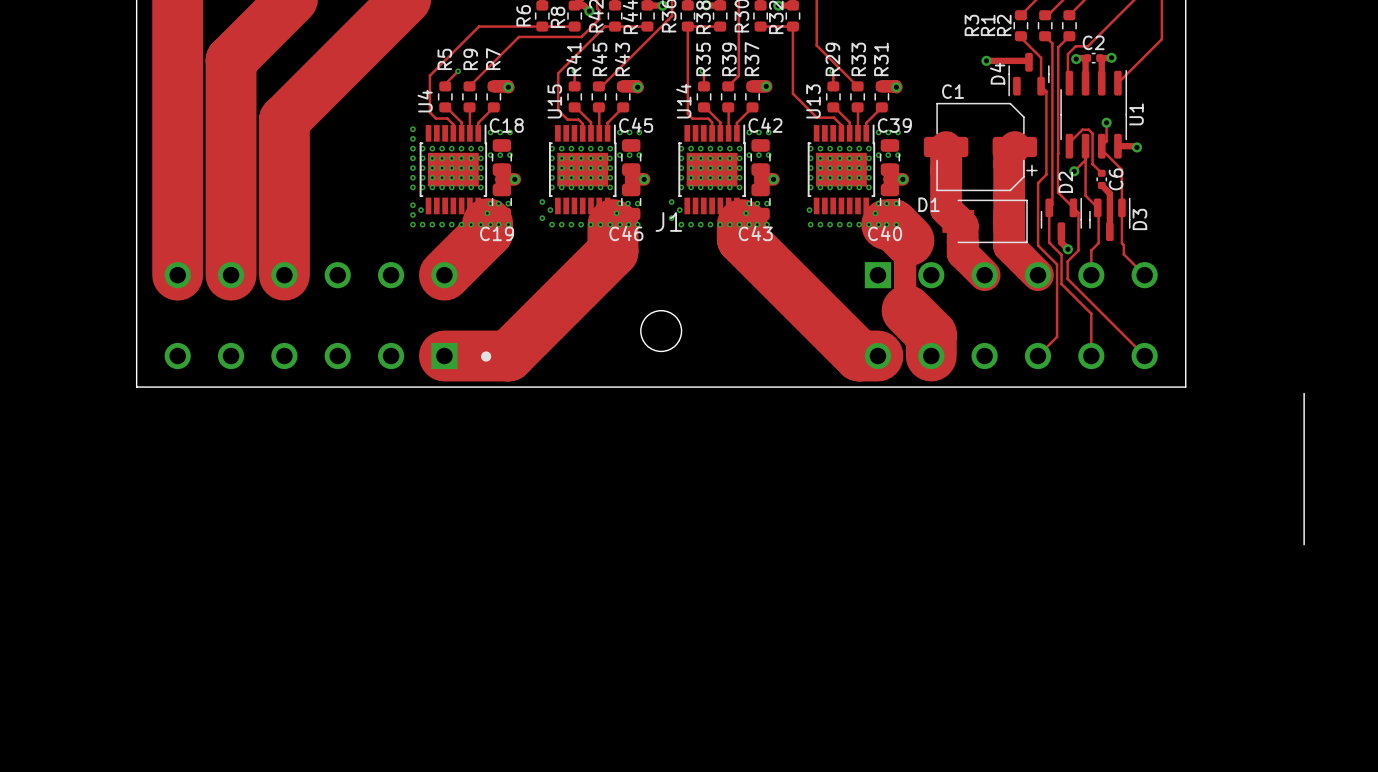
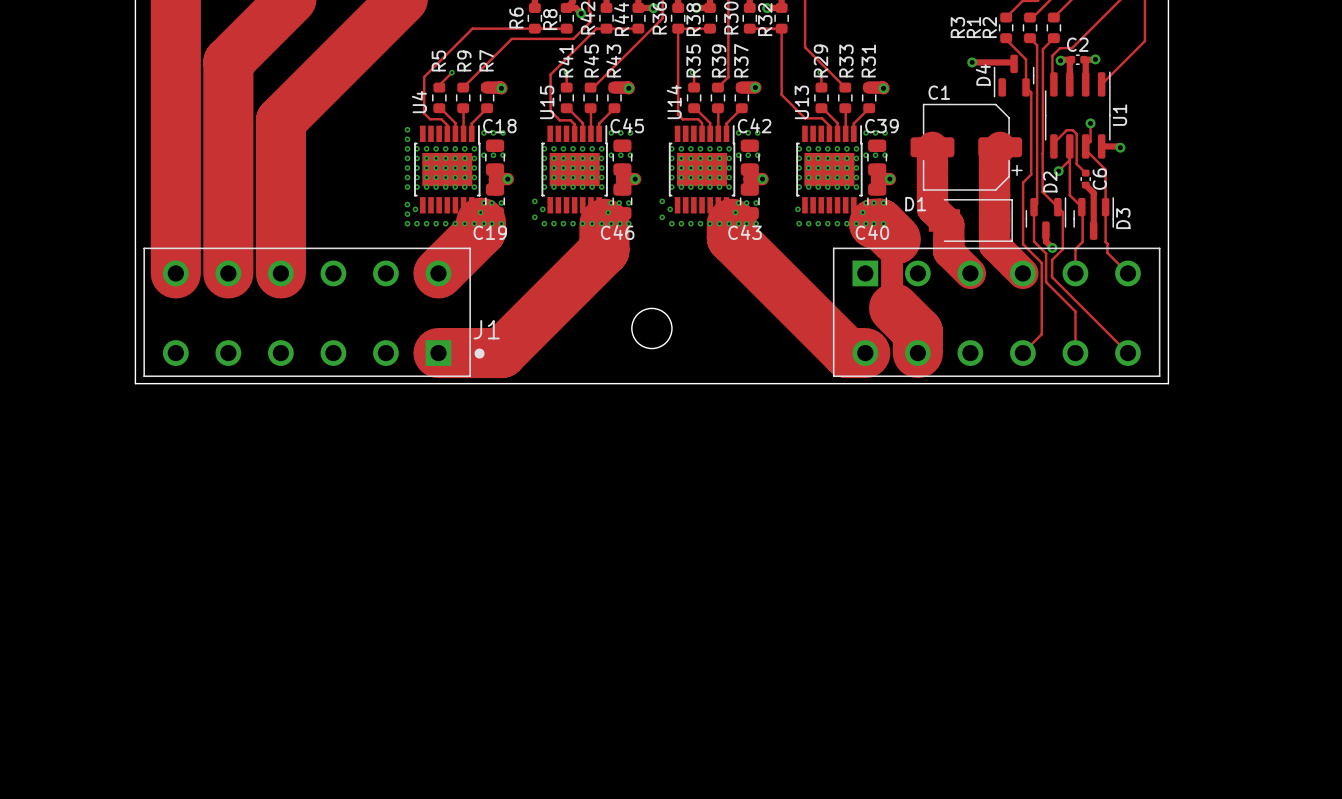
J1 name position: J1 (668, 221) -> J1 (486, 329)
J1 footprint: [164, 262, 1305, 546] -> [143, 247, 1161, 378]

